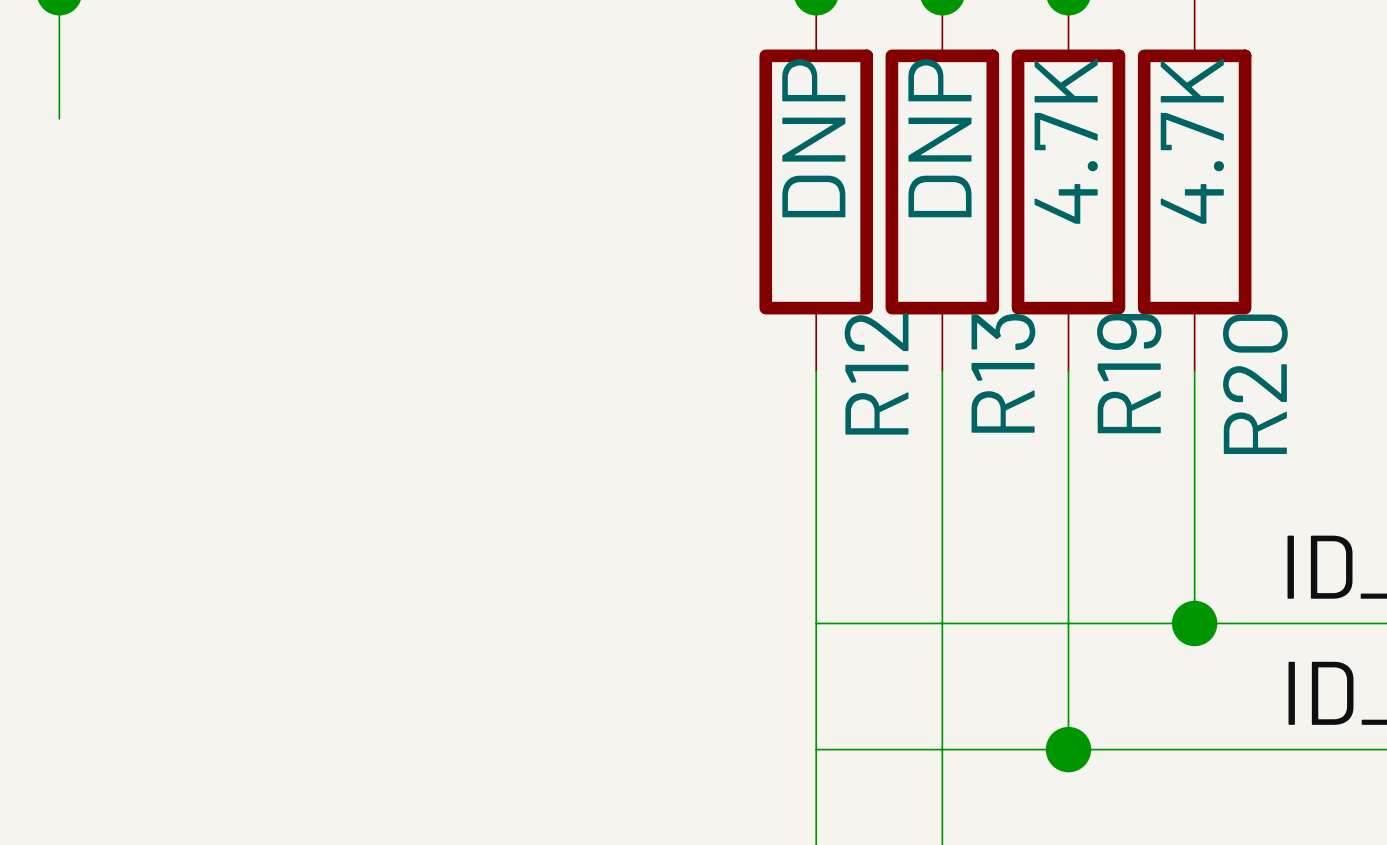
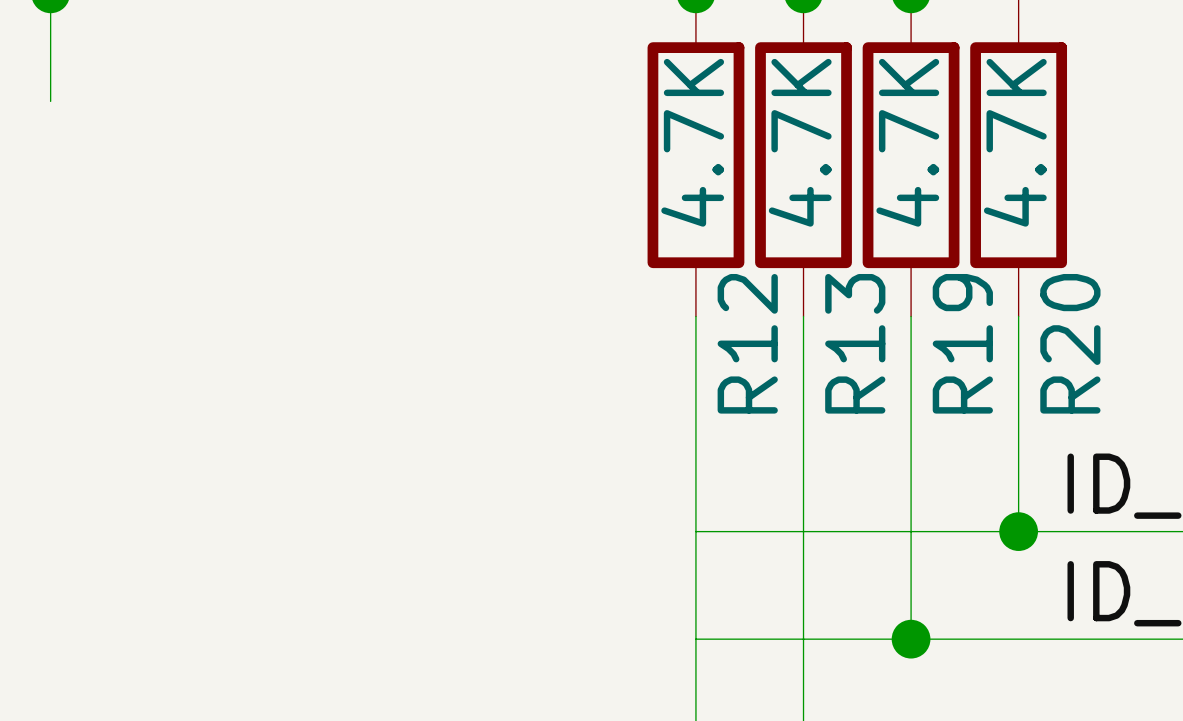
R12 value: DNP (813, 138) -> 4.7K (692, 142)
R13 value: DNP (939, 138) -> 4.7K (800, 142)

